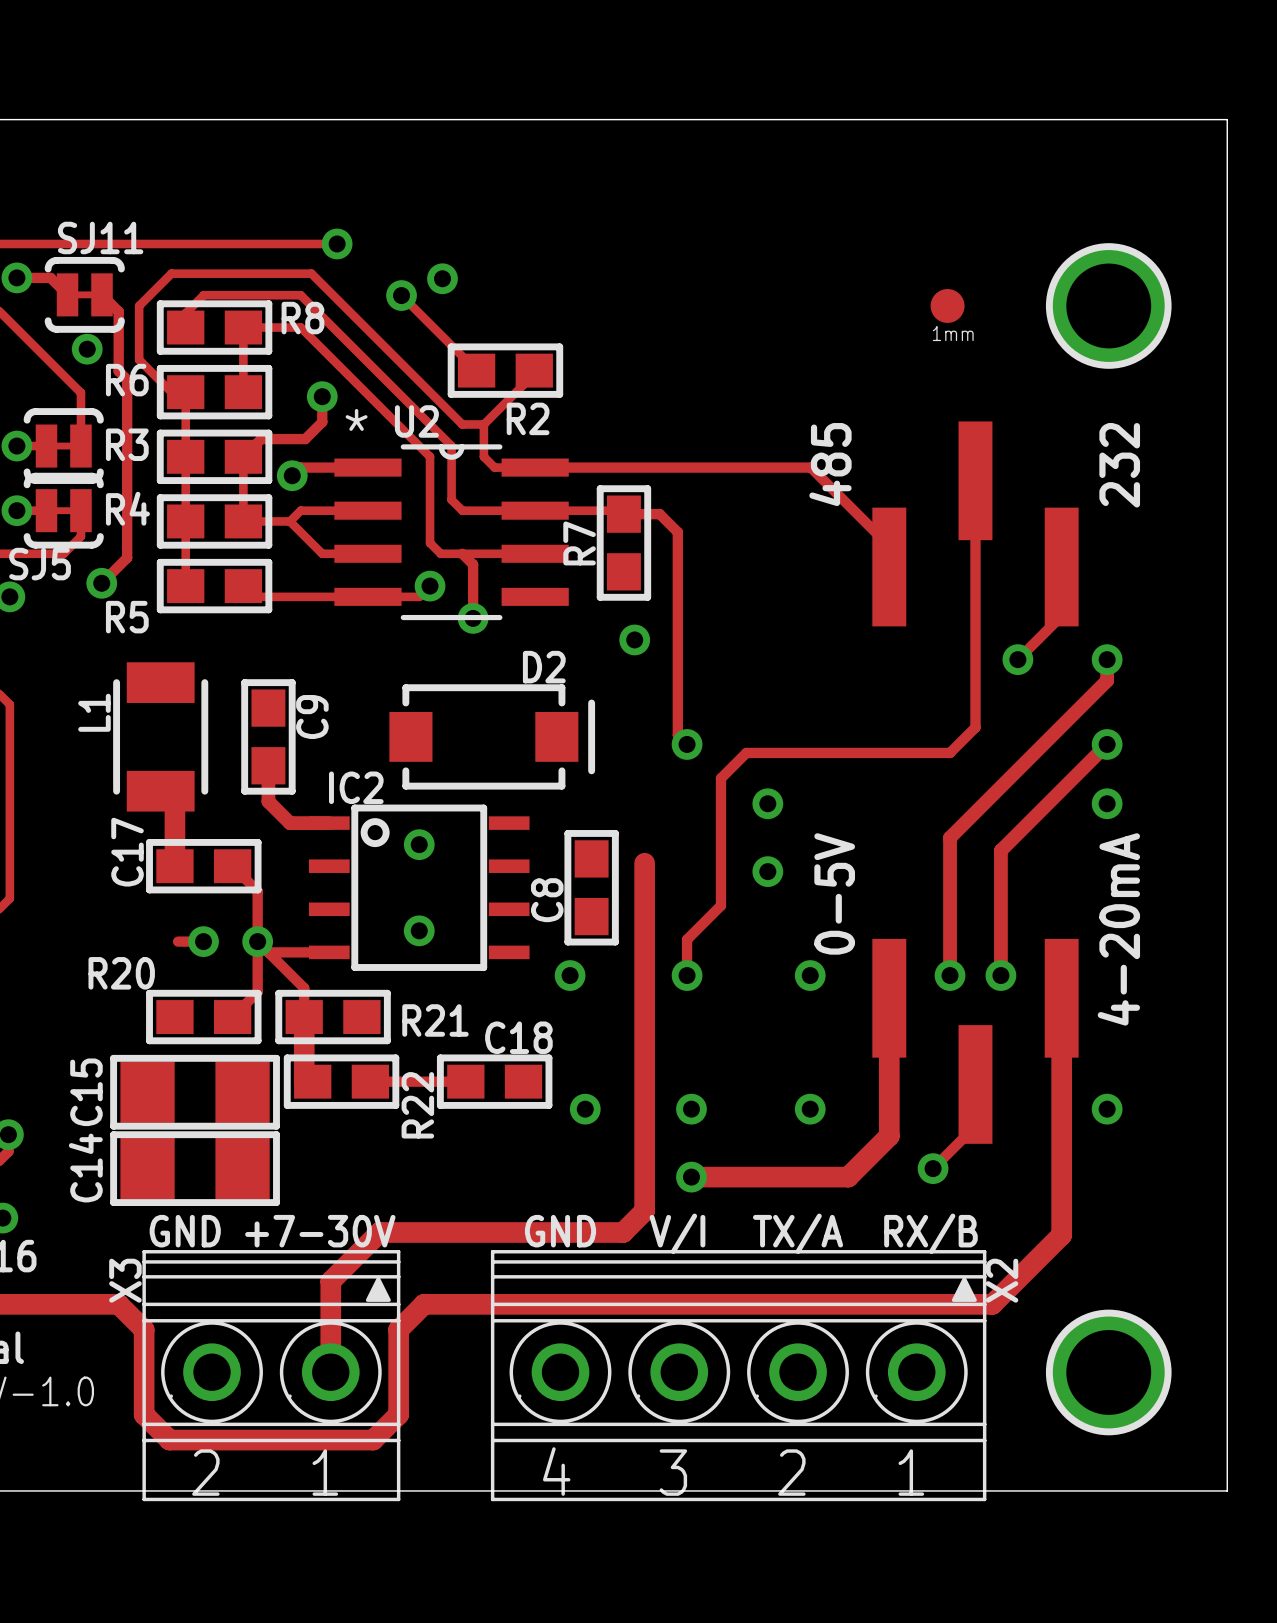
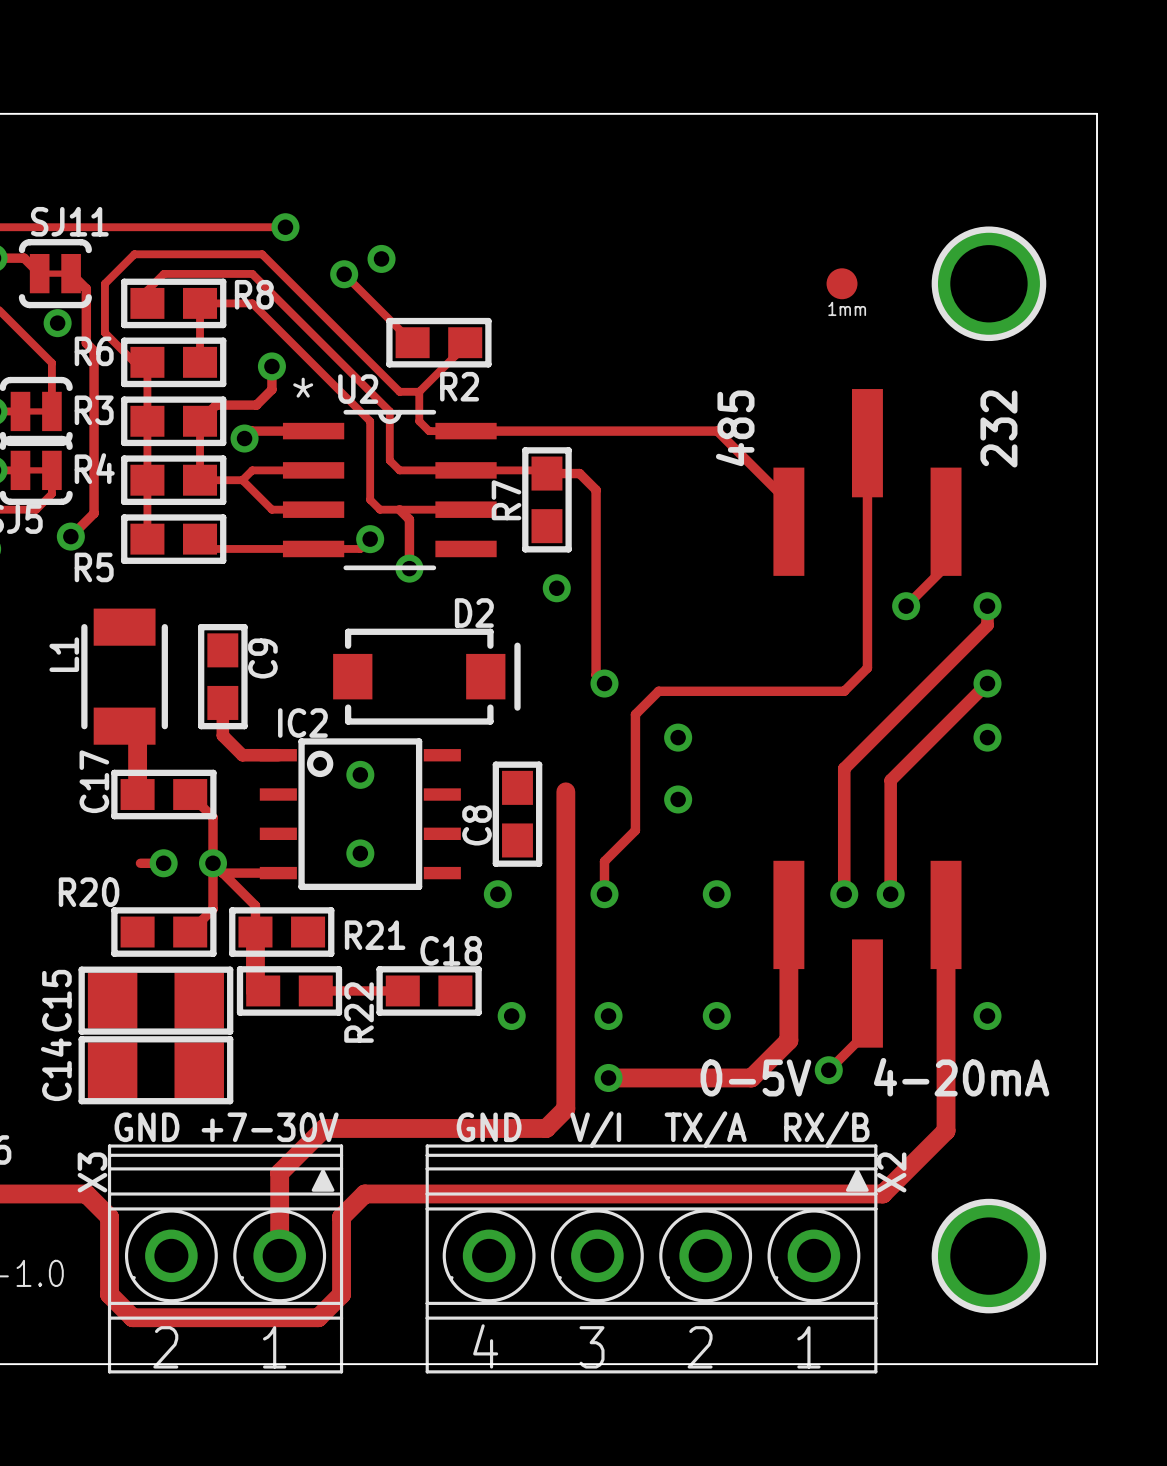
text rotation: 0° (834, 893) -> 90° clockwise (755, 1077)
text position: 0-5V (834, 893) -> 0-5V (755, 1077)
text rotation: 0° (1118, 929) -> 90° clockwise (961, 1077)
text position: 4-20mA (1118, 929) -> 4-20mA (961, 1077)

